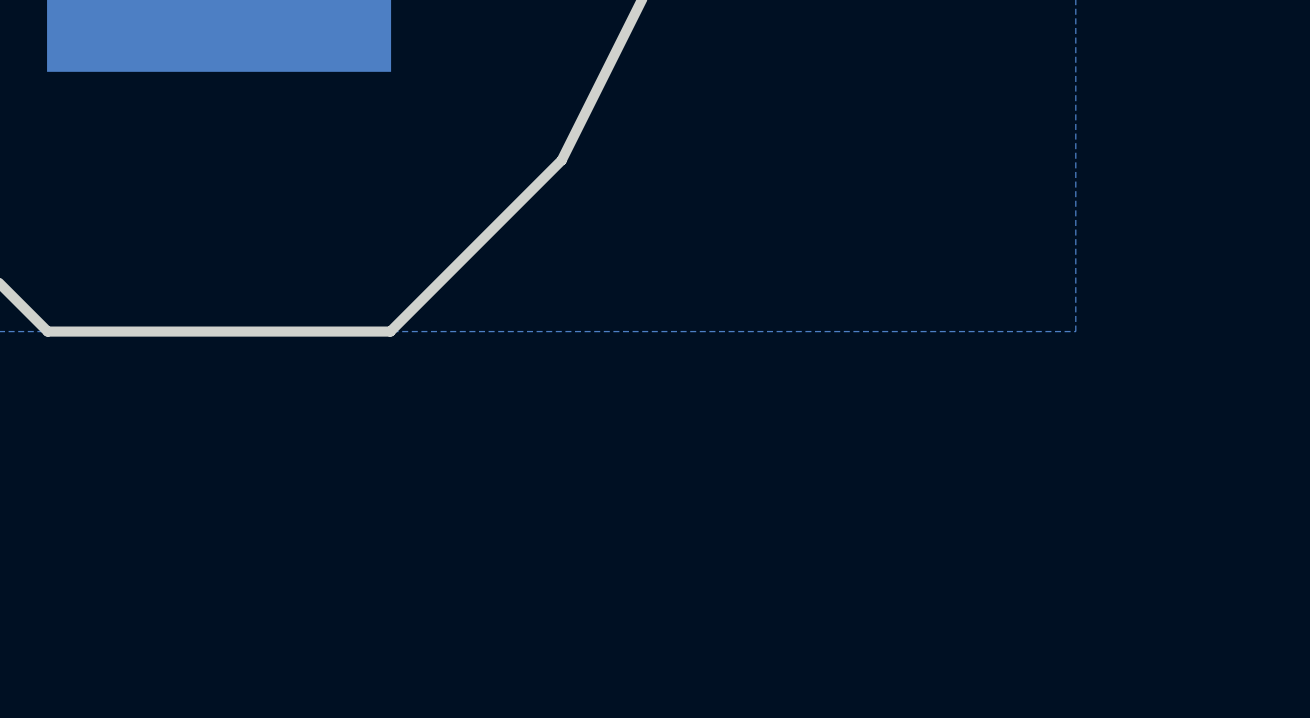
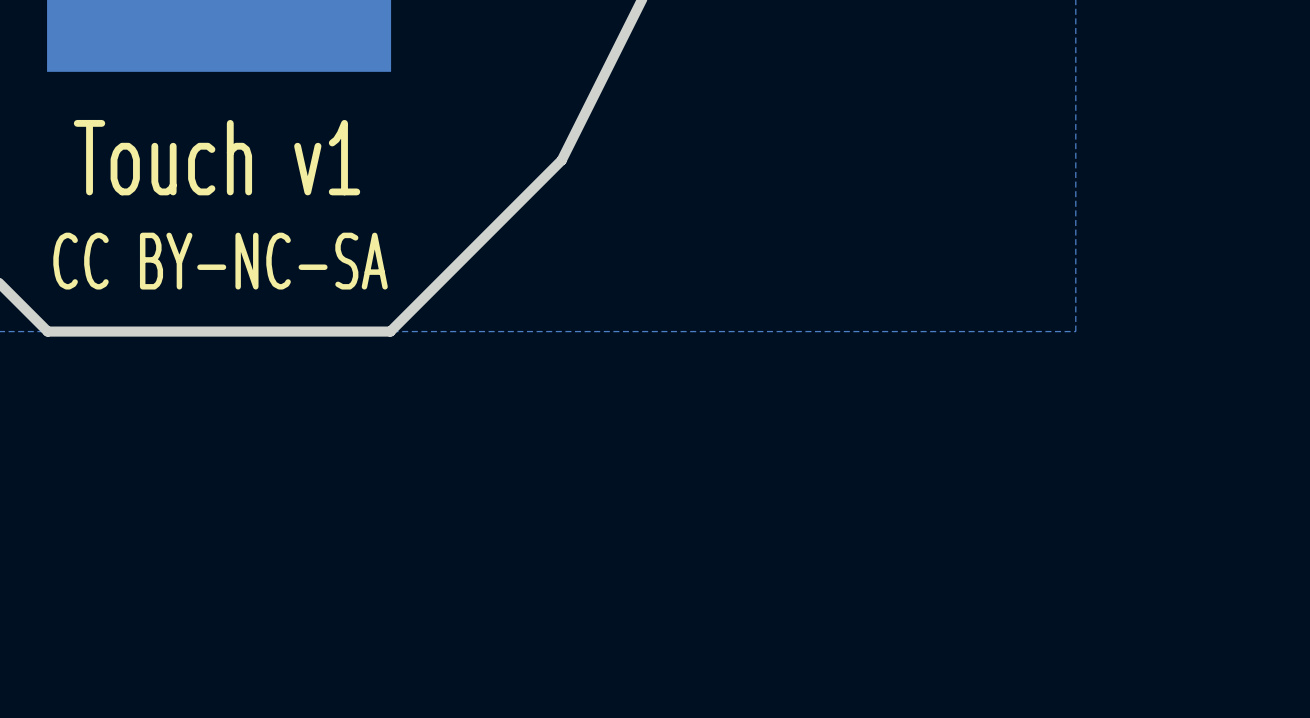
text: none -> Touch v1 (217, 157)
text: none -> CC BY-NC-SA (220, 261)

